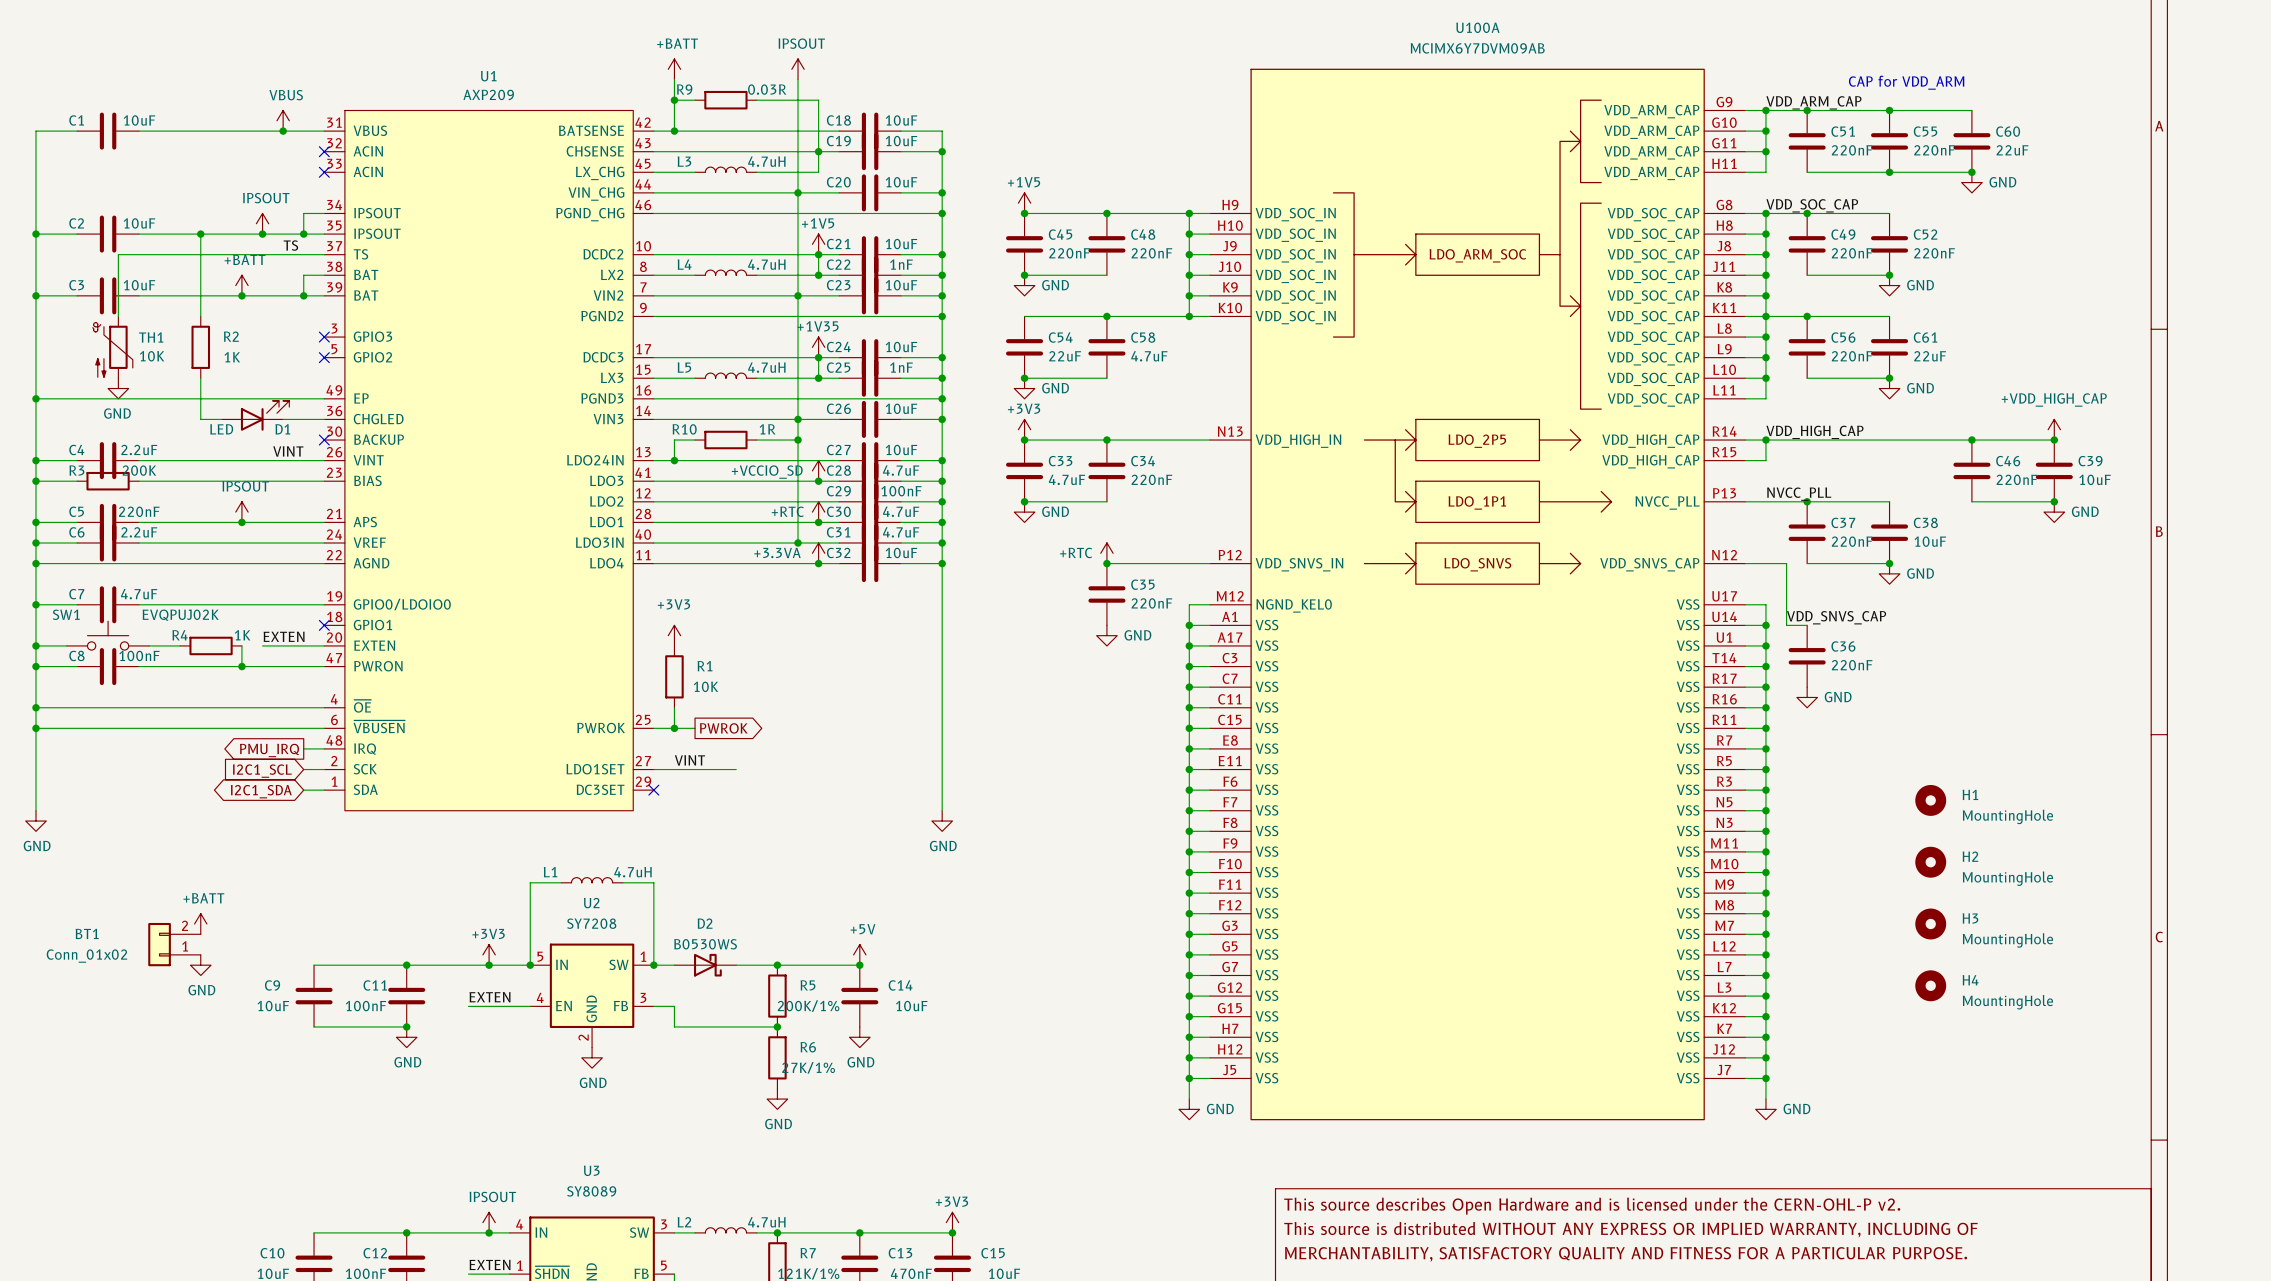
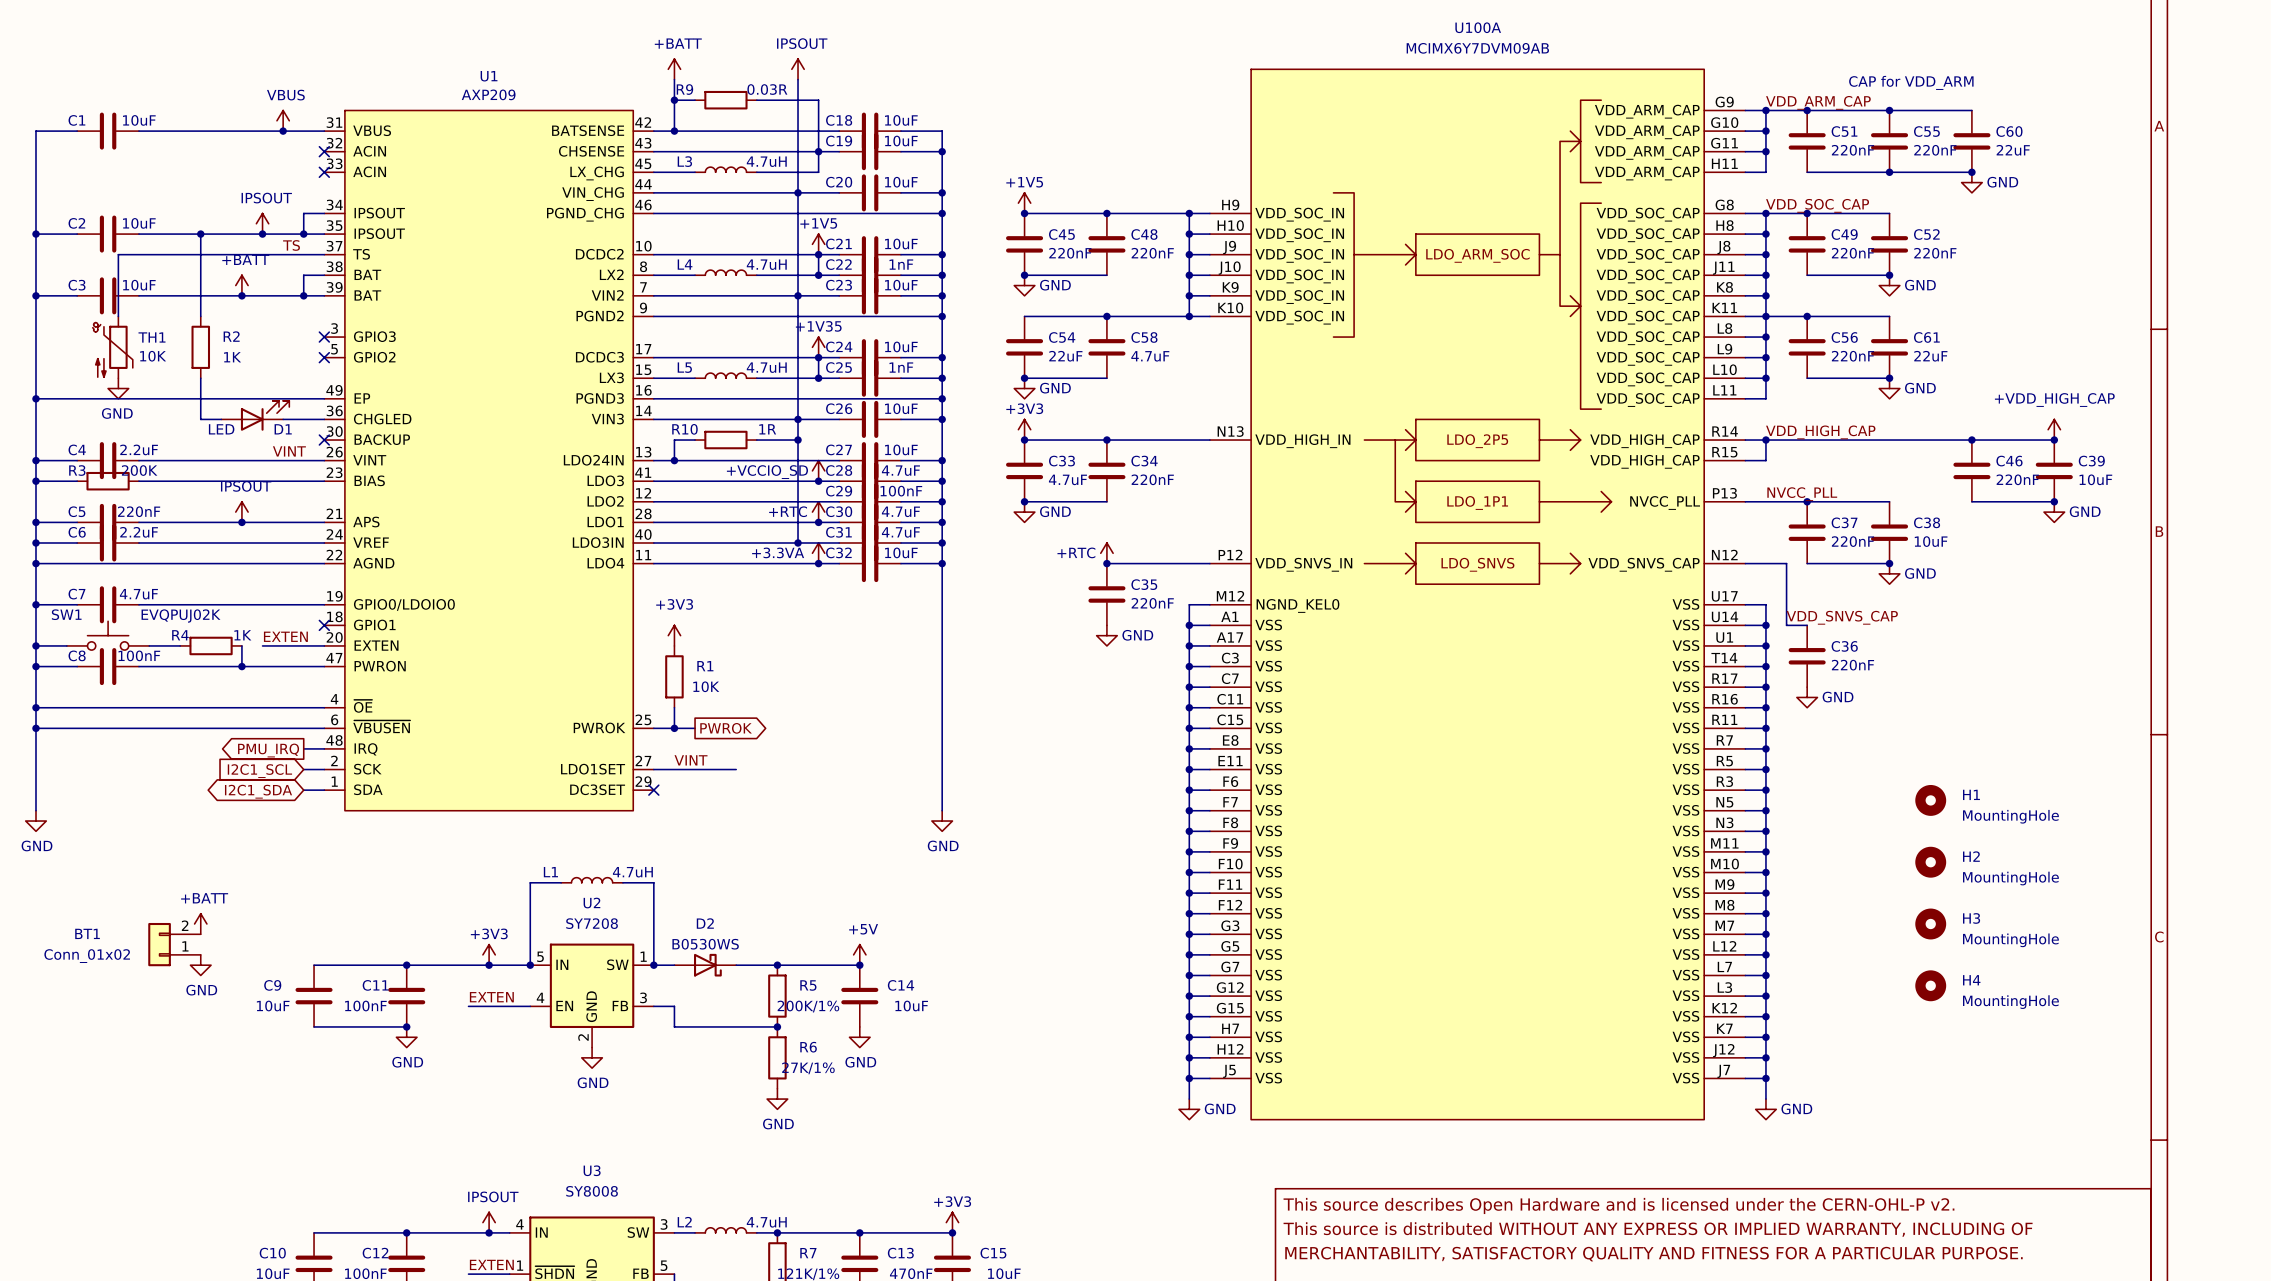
U3 value: SY8089 (591, 1191) -> SY8008 (592, 1191)

